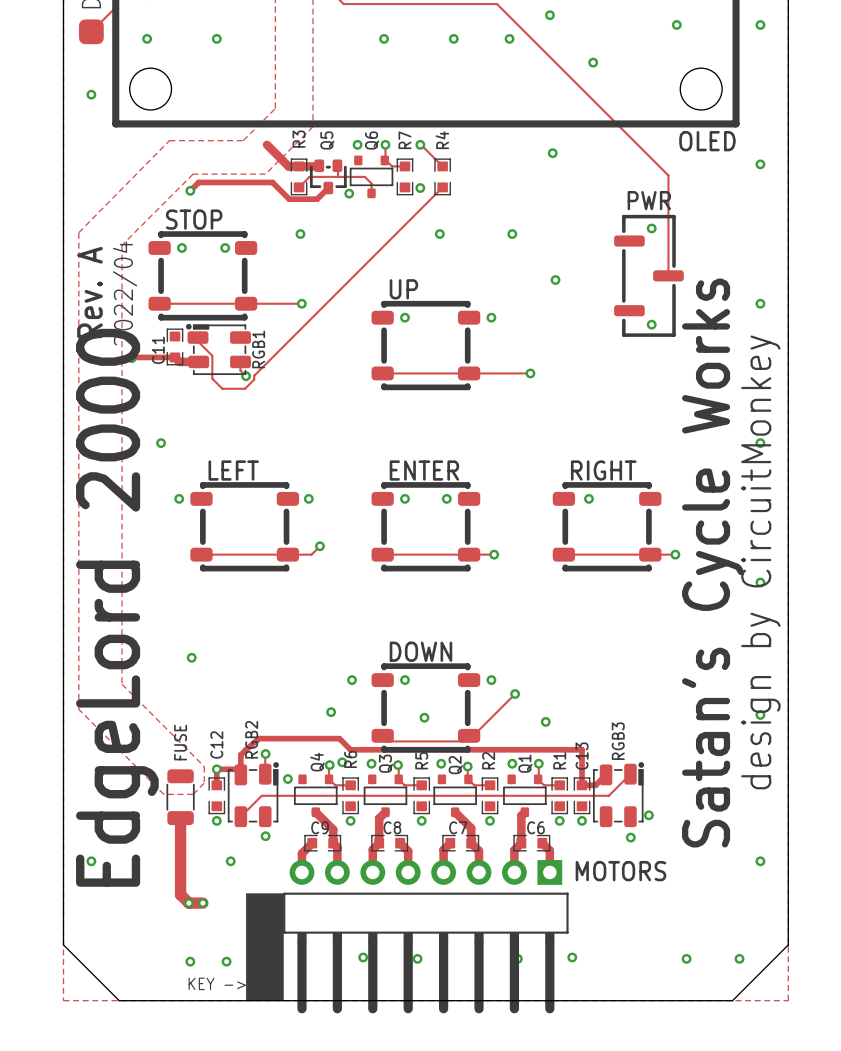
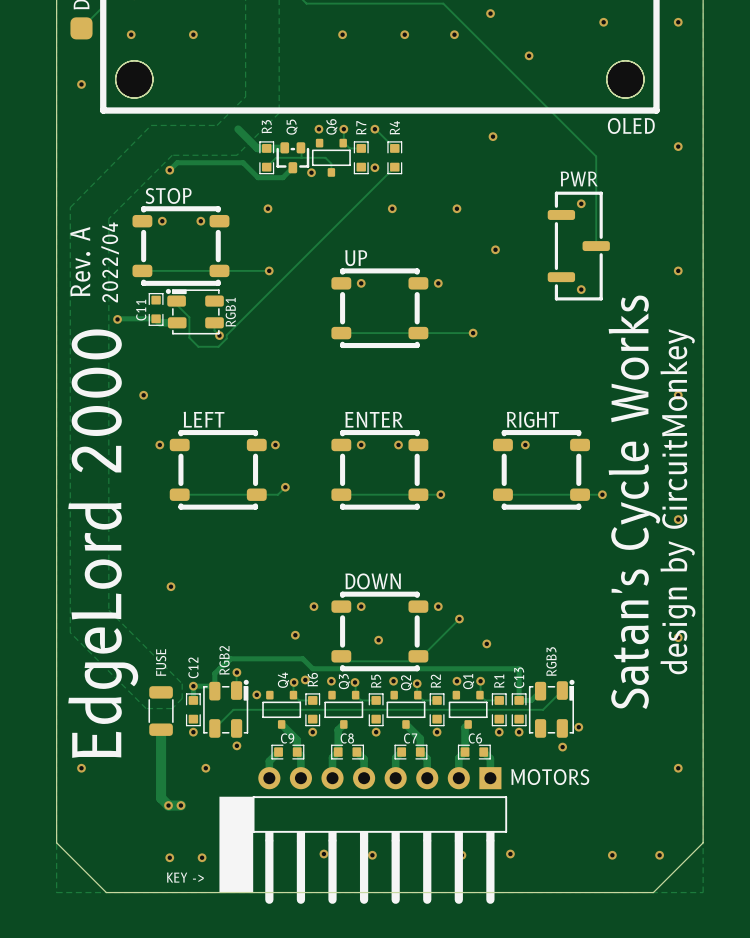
hole: none -> (134, 79)
hole: none -> (625, 79)

